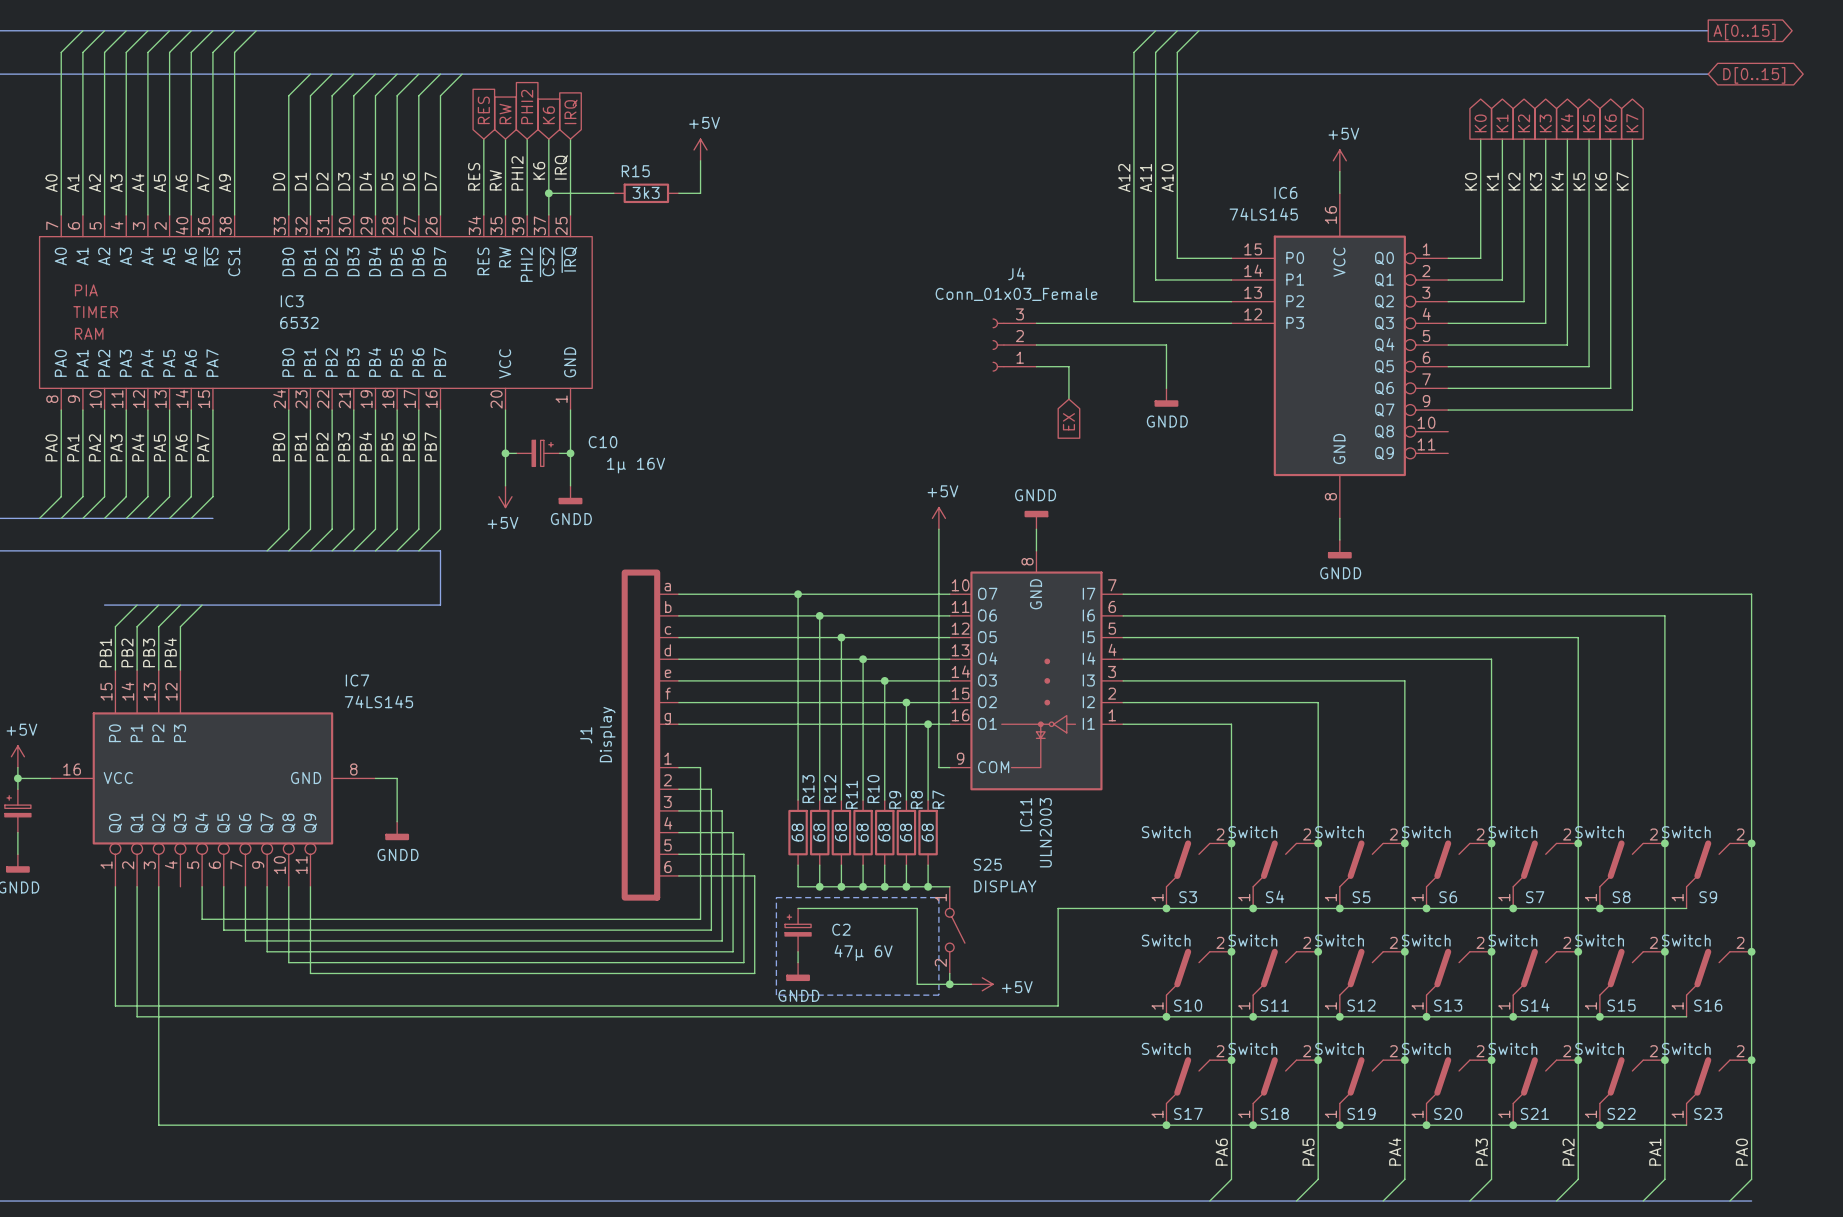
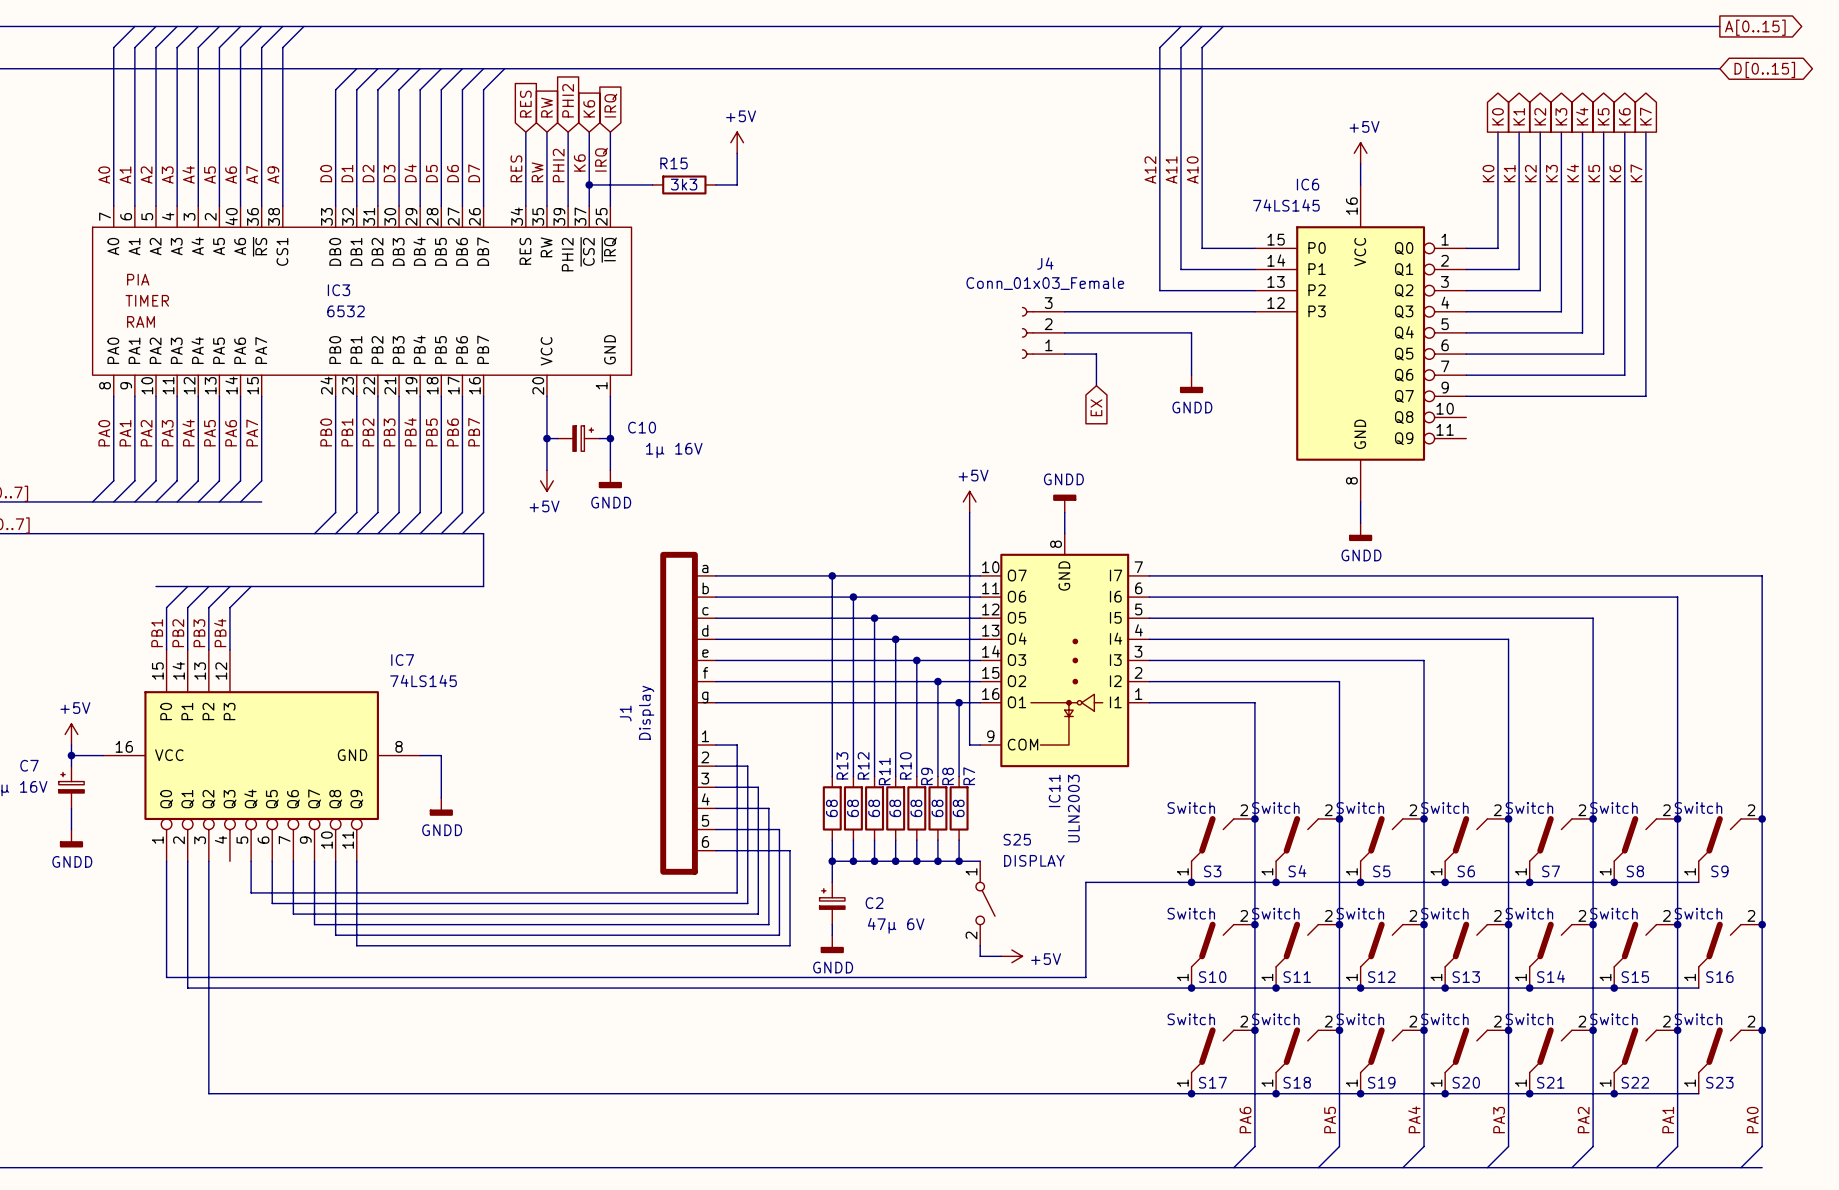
junction: none -> (832, 861)
line: (776, 897) (938, 897) (938, 995) (776, 995) (776, 897) -> none
wire: (798, 908) (917, 908) (917, 984) (949, 984) -> (832, 882) (832, 861)
junction: (949, 984) -> none

